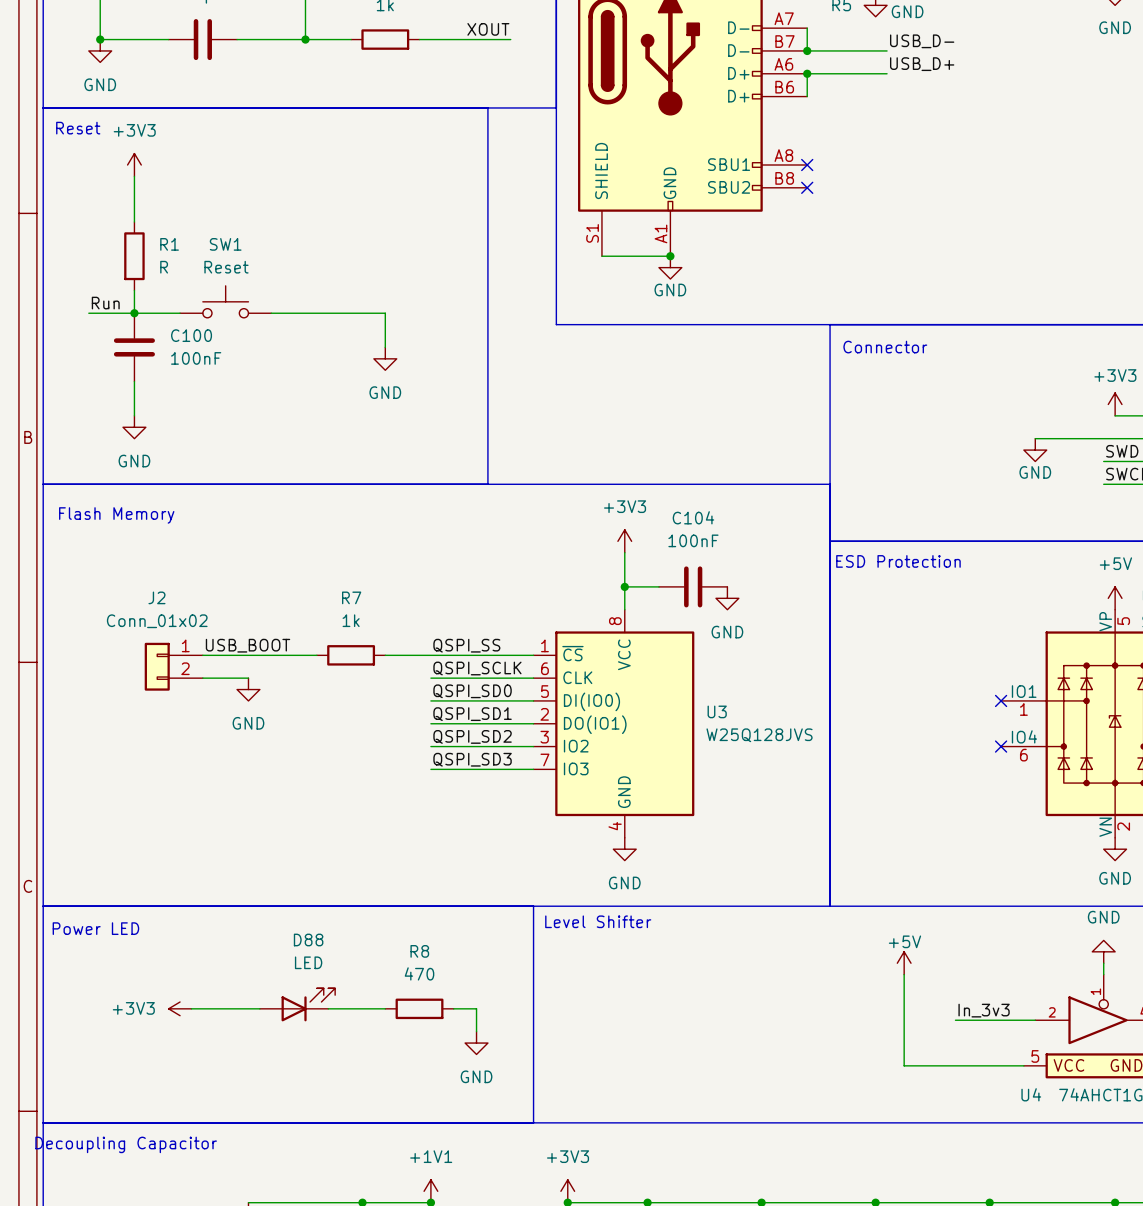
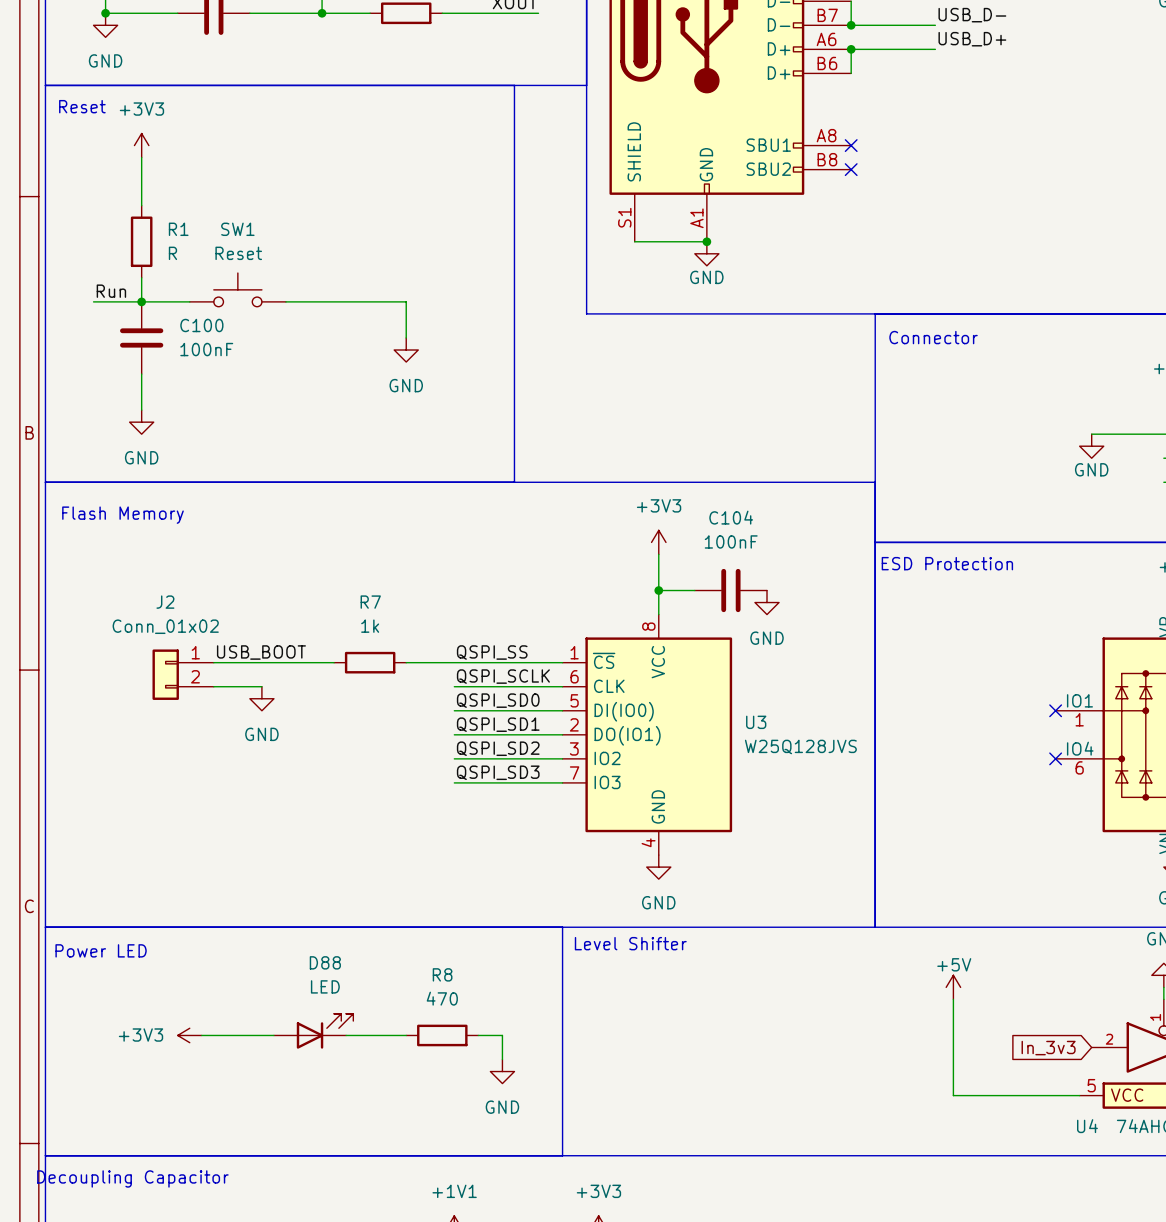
label: In_3v3 (984, 1010) -> none
wire: (955, 1020) (1035, 1020) -> none
global label: none -> In_3v3 (1048, 1048)

